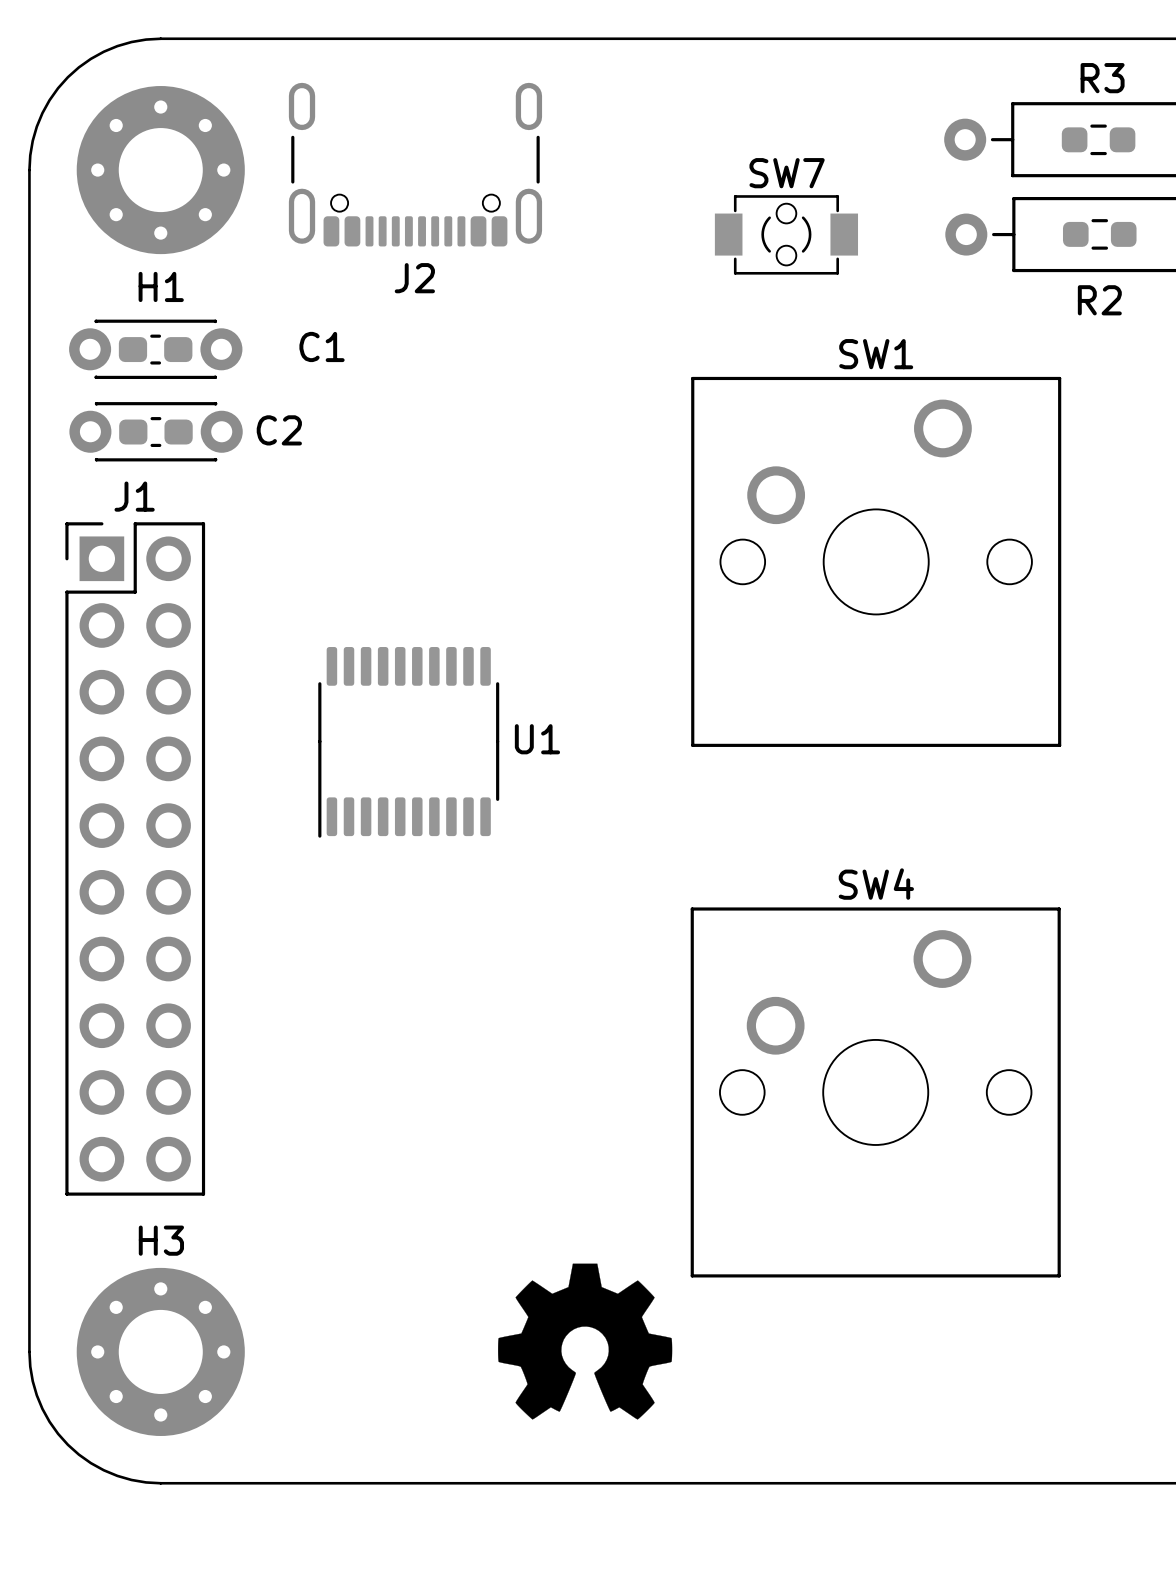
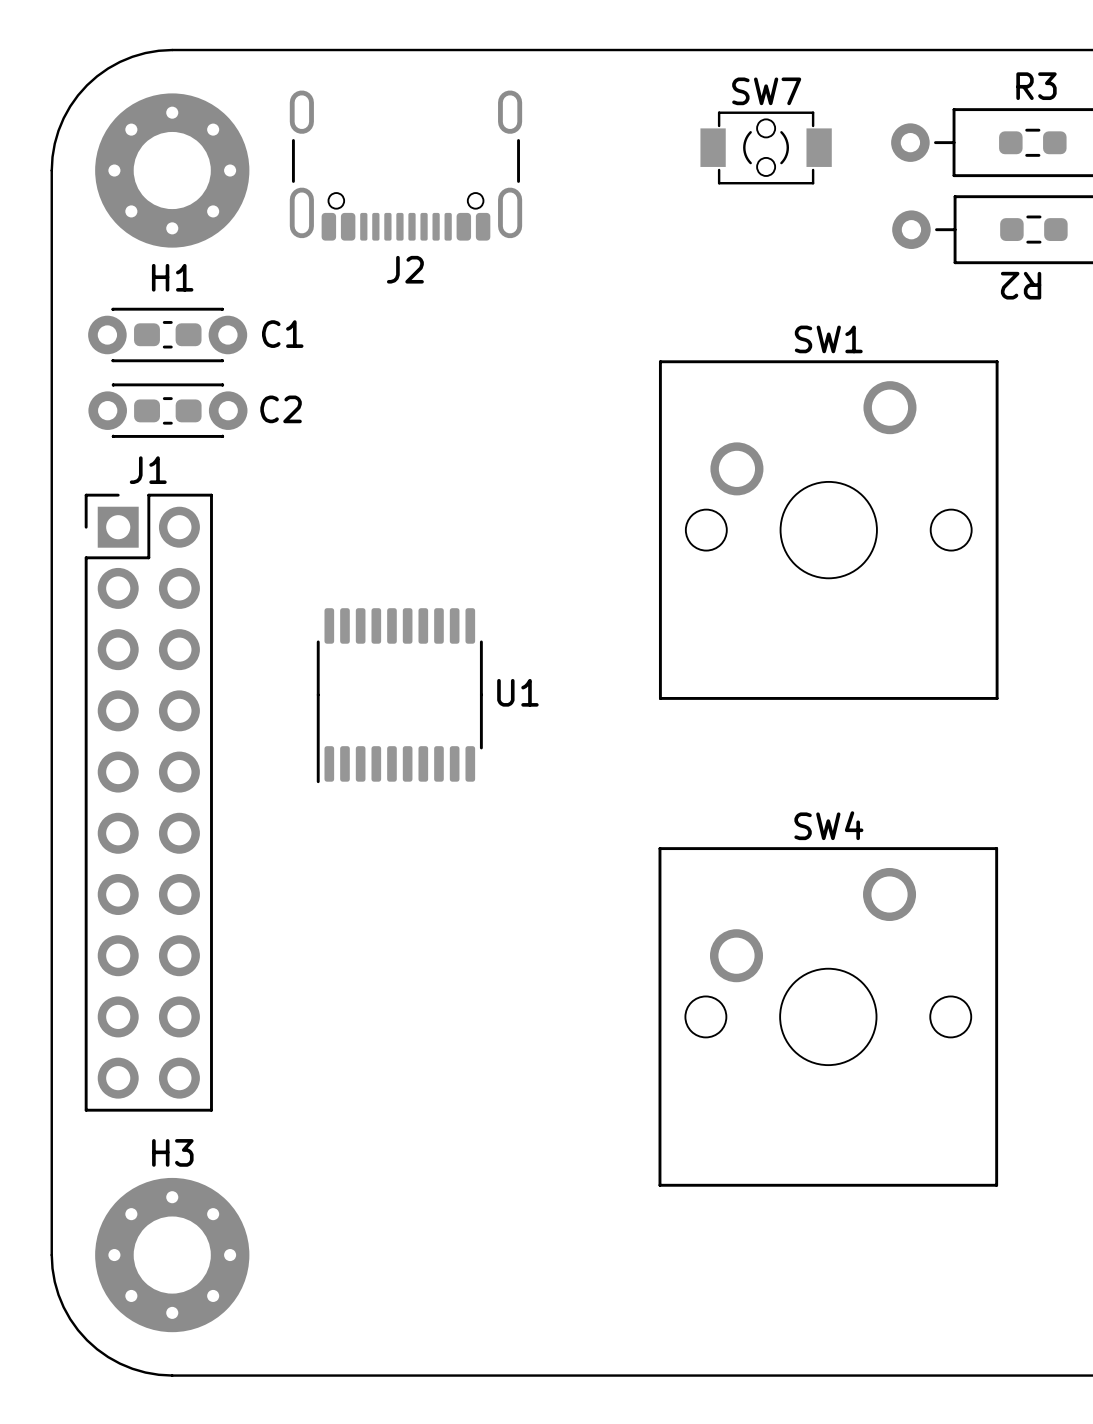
SW7 position: (786, 234) -> (766, 147)
R2 name rotation: 0° (1099, 300) -> 180° (1021, 285)
C1 name position: C1 (322, 346) -> C1 (282, 334)
drawing: [498, 1263, 673, 1420] -> none

